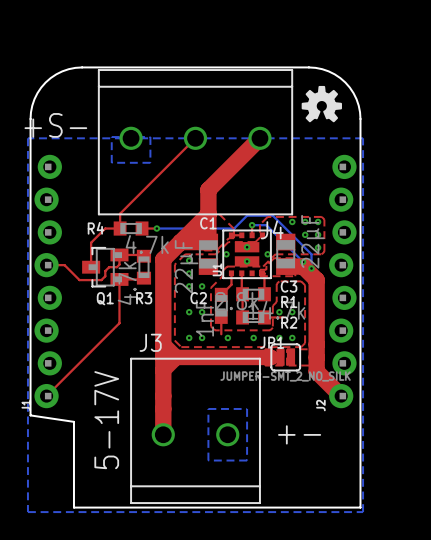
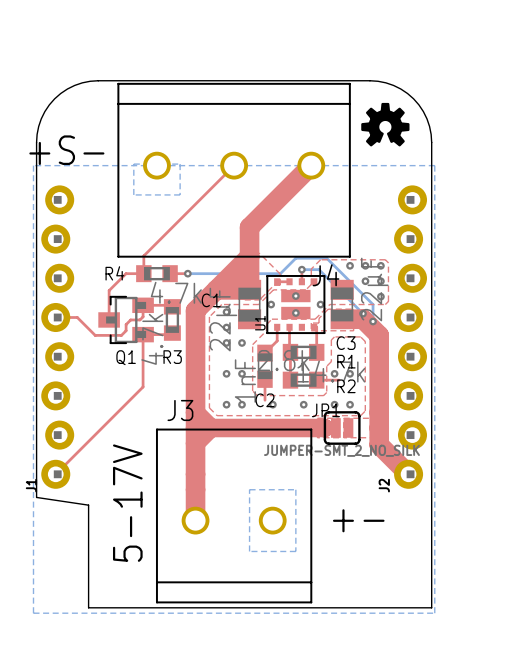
C1 name position: C1 (208, 223) -> C1 (211, 300)
C2 name position: C2 (198, 298) -> C2 (264, 400)

